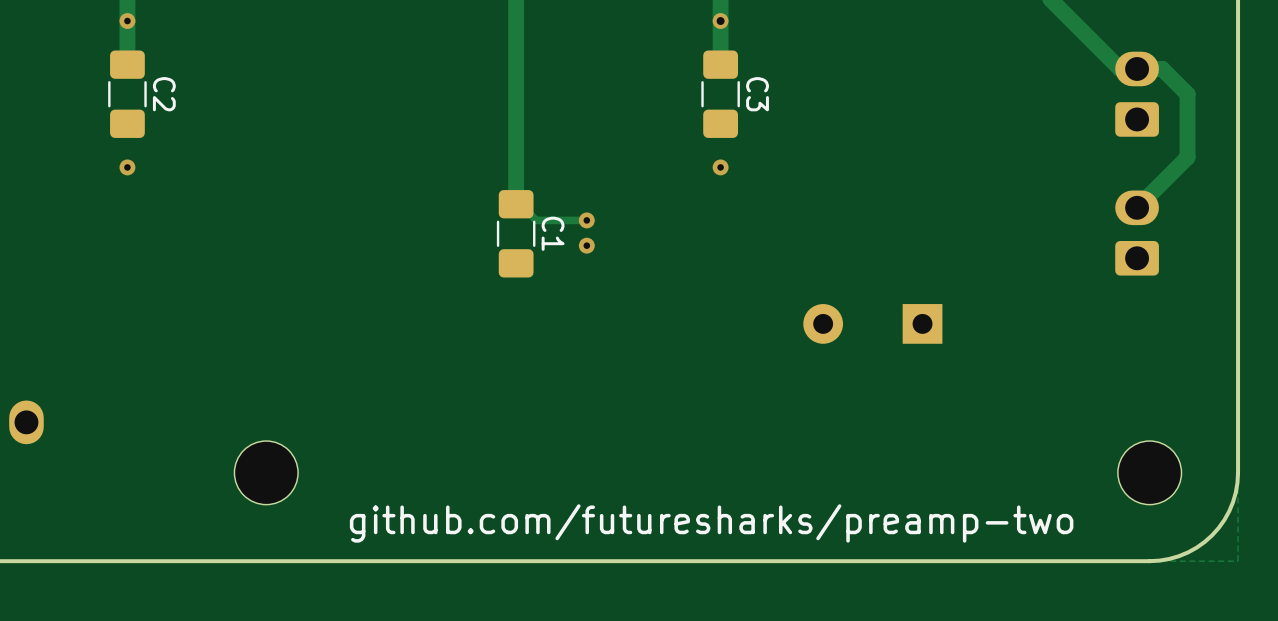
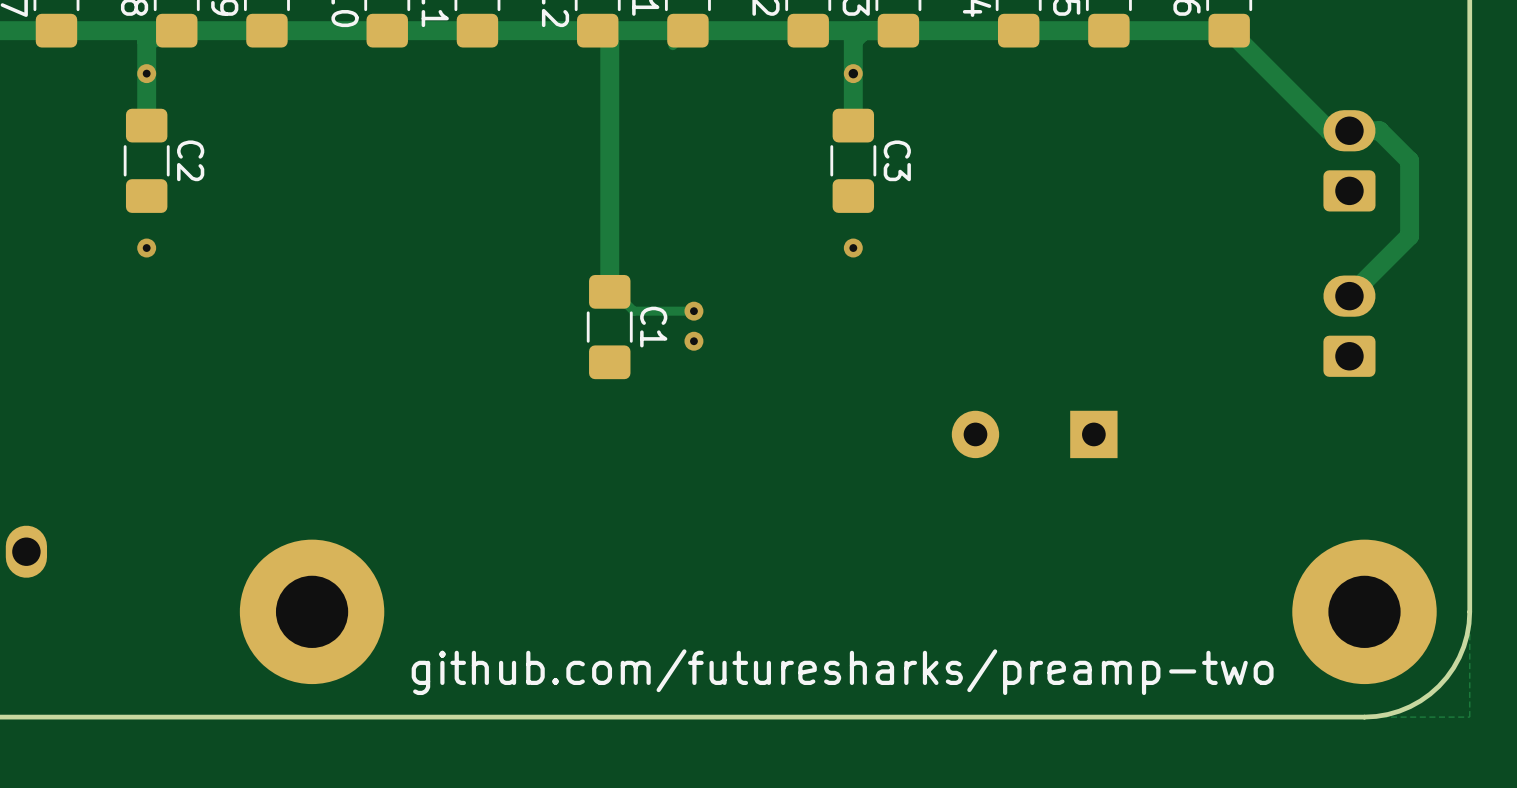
part footprint: [234, 441, 299, 505] -> [239, 539, 385, 685]
part footprint: [1117, 441, 1182, 505] -> [1292, 539, 1437, 685]

